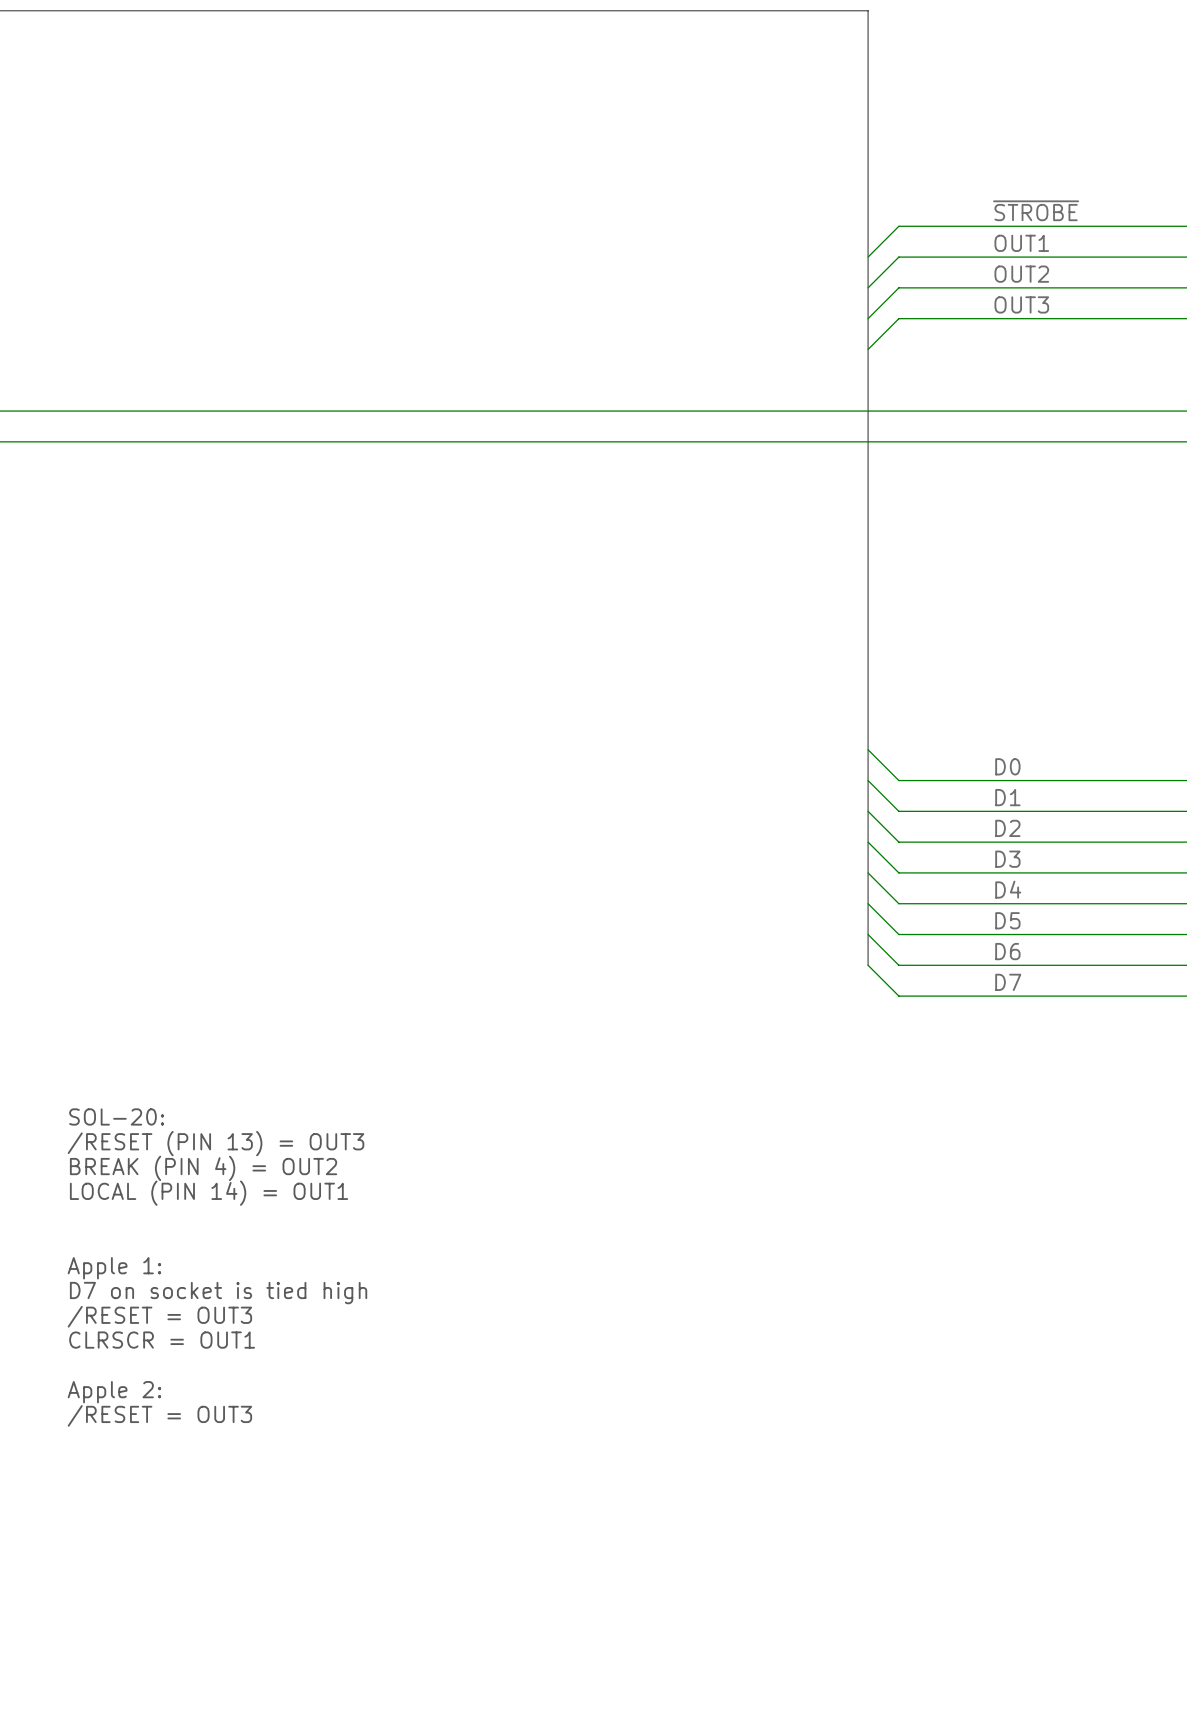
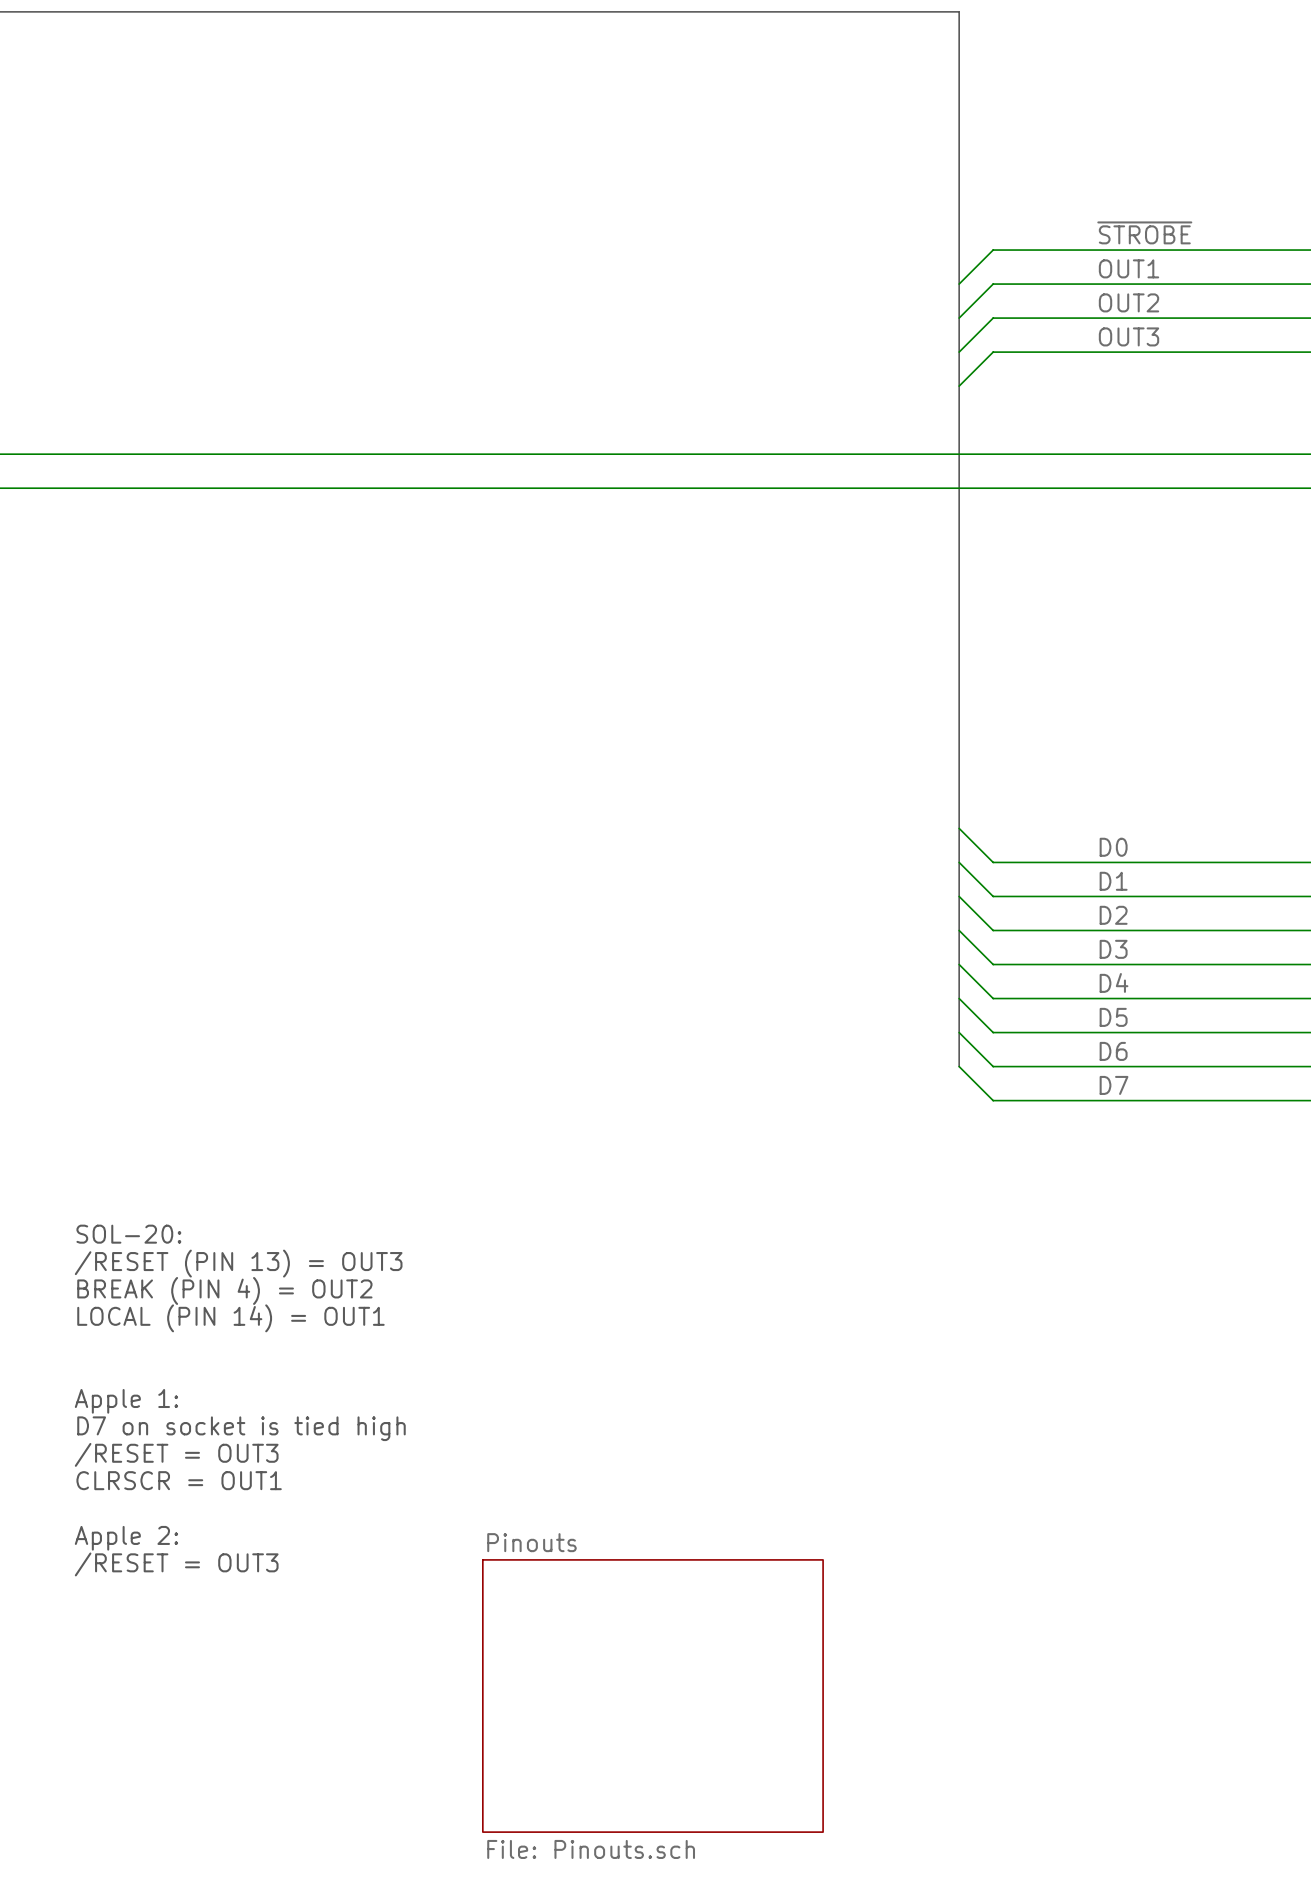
sheet Pinouts: none -> File: Pinouts.sch (652, 1696)

